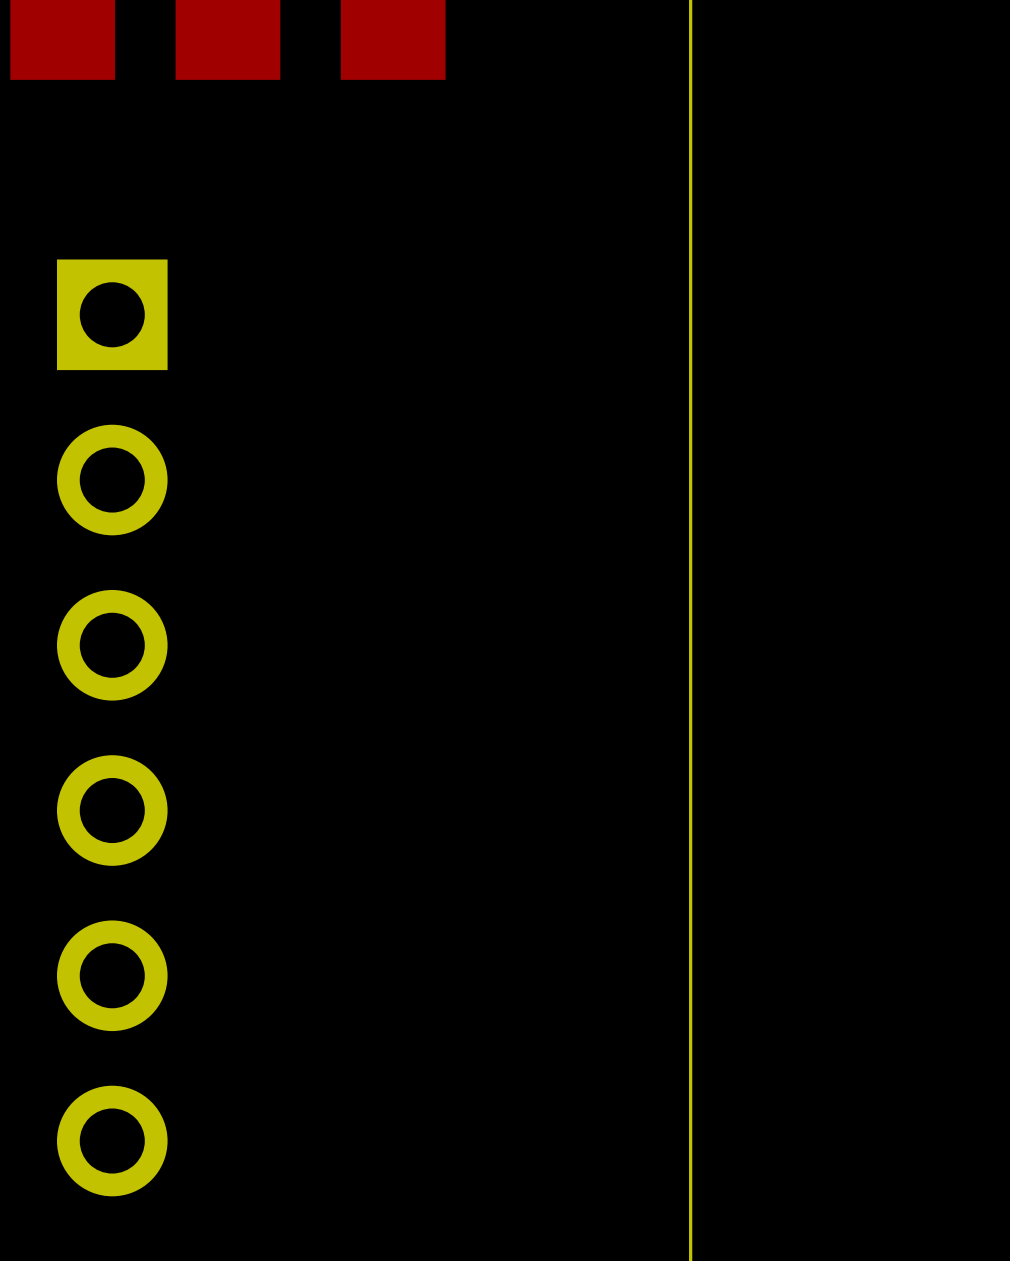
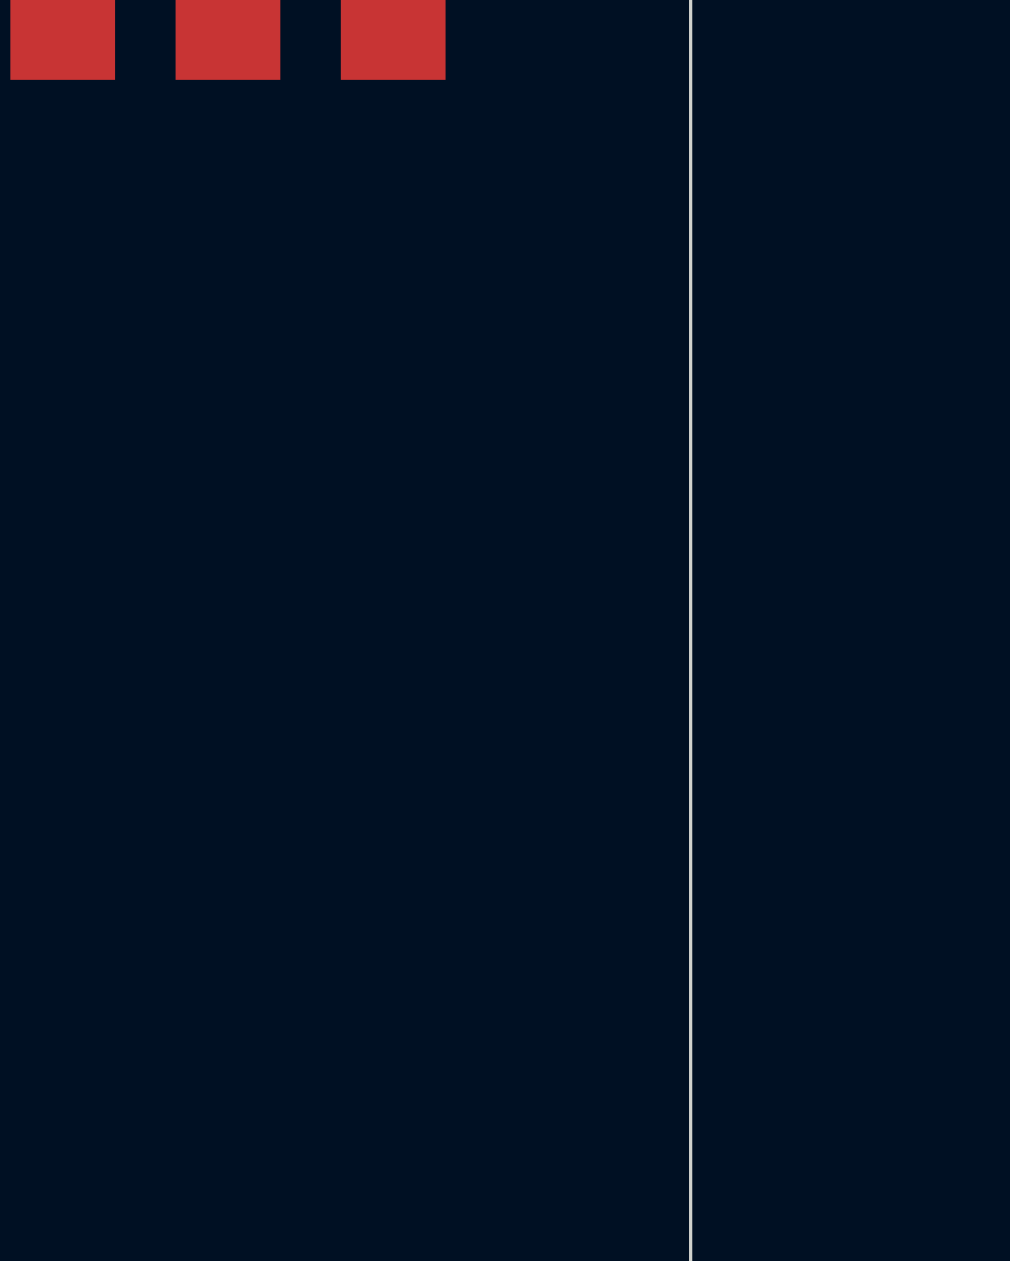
part: (112, 727) -> none

